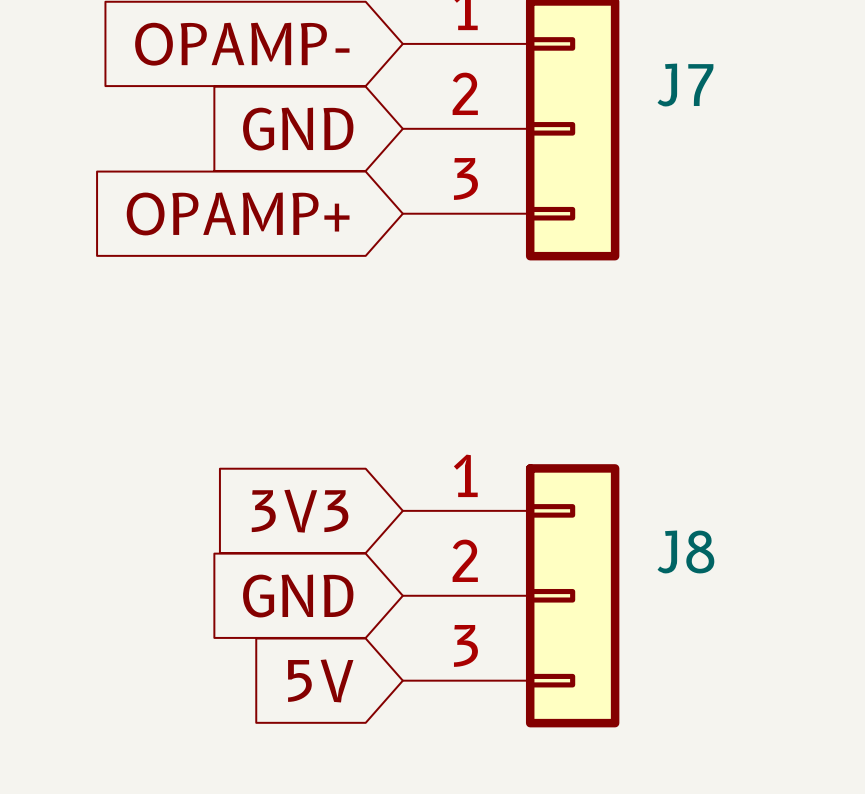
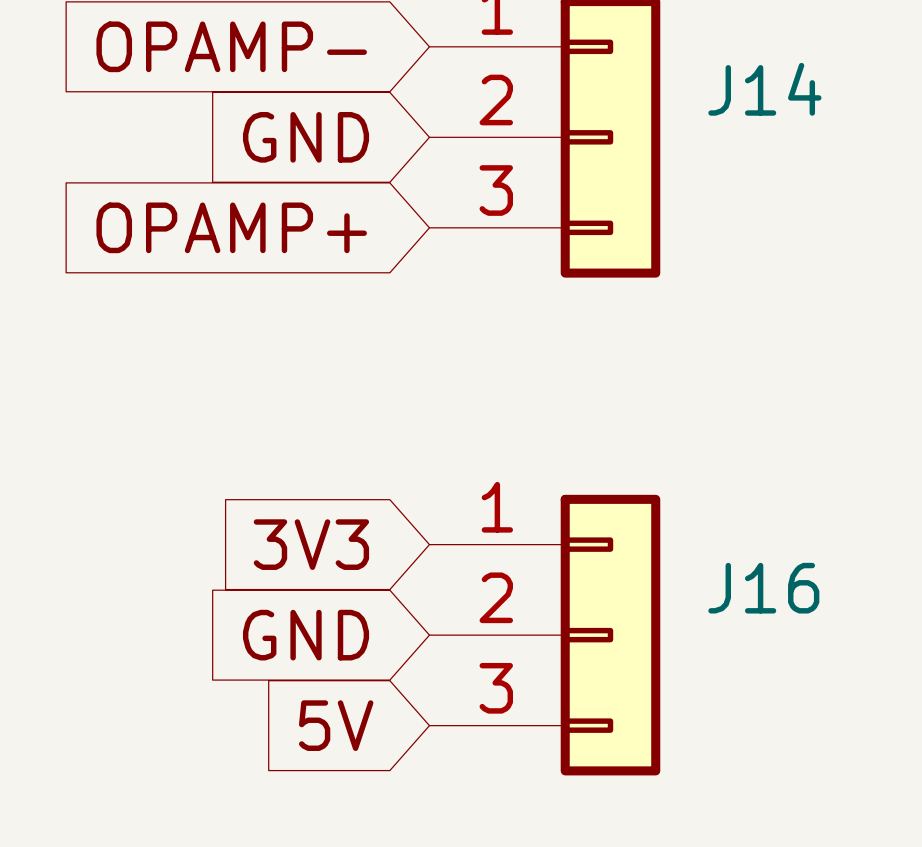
J7 name: J7 (685, 85) -> J14 (764, 89)
J8 name: J8 (685, 551) -> J16 (763, 588)

